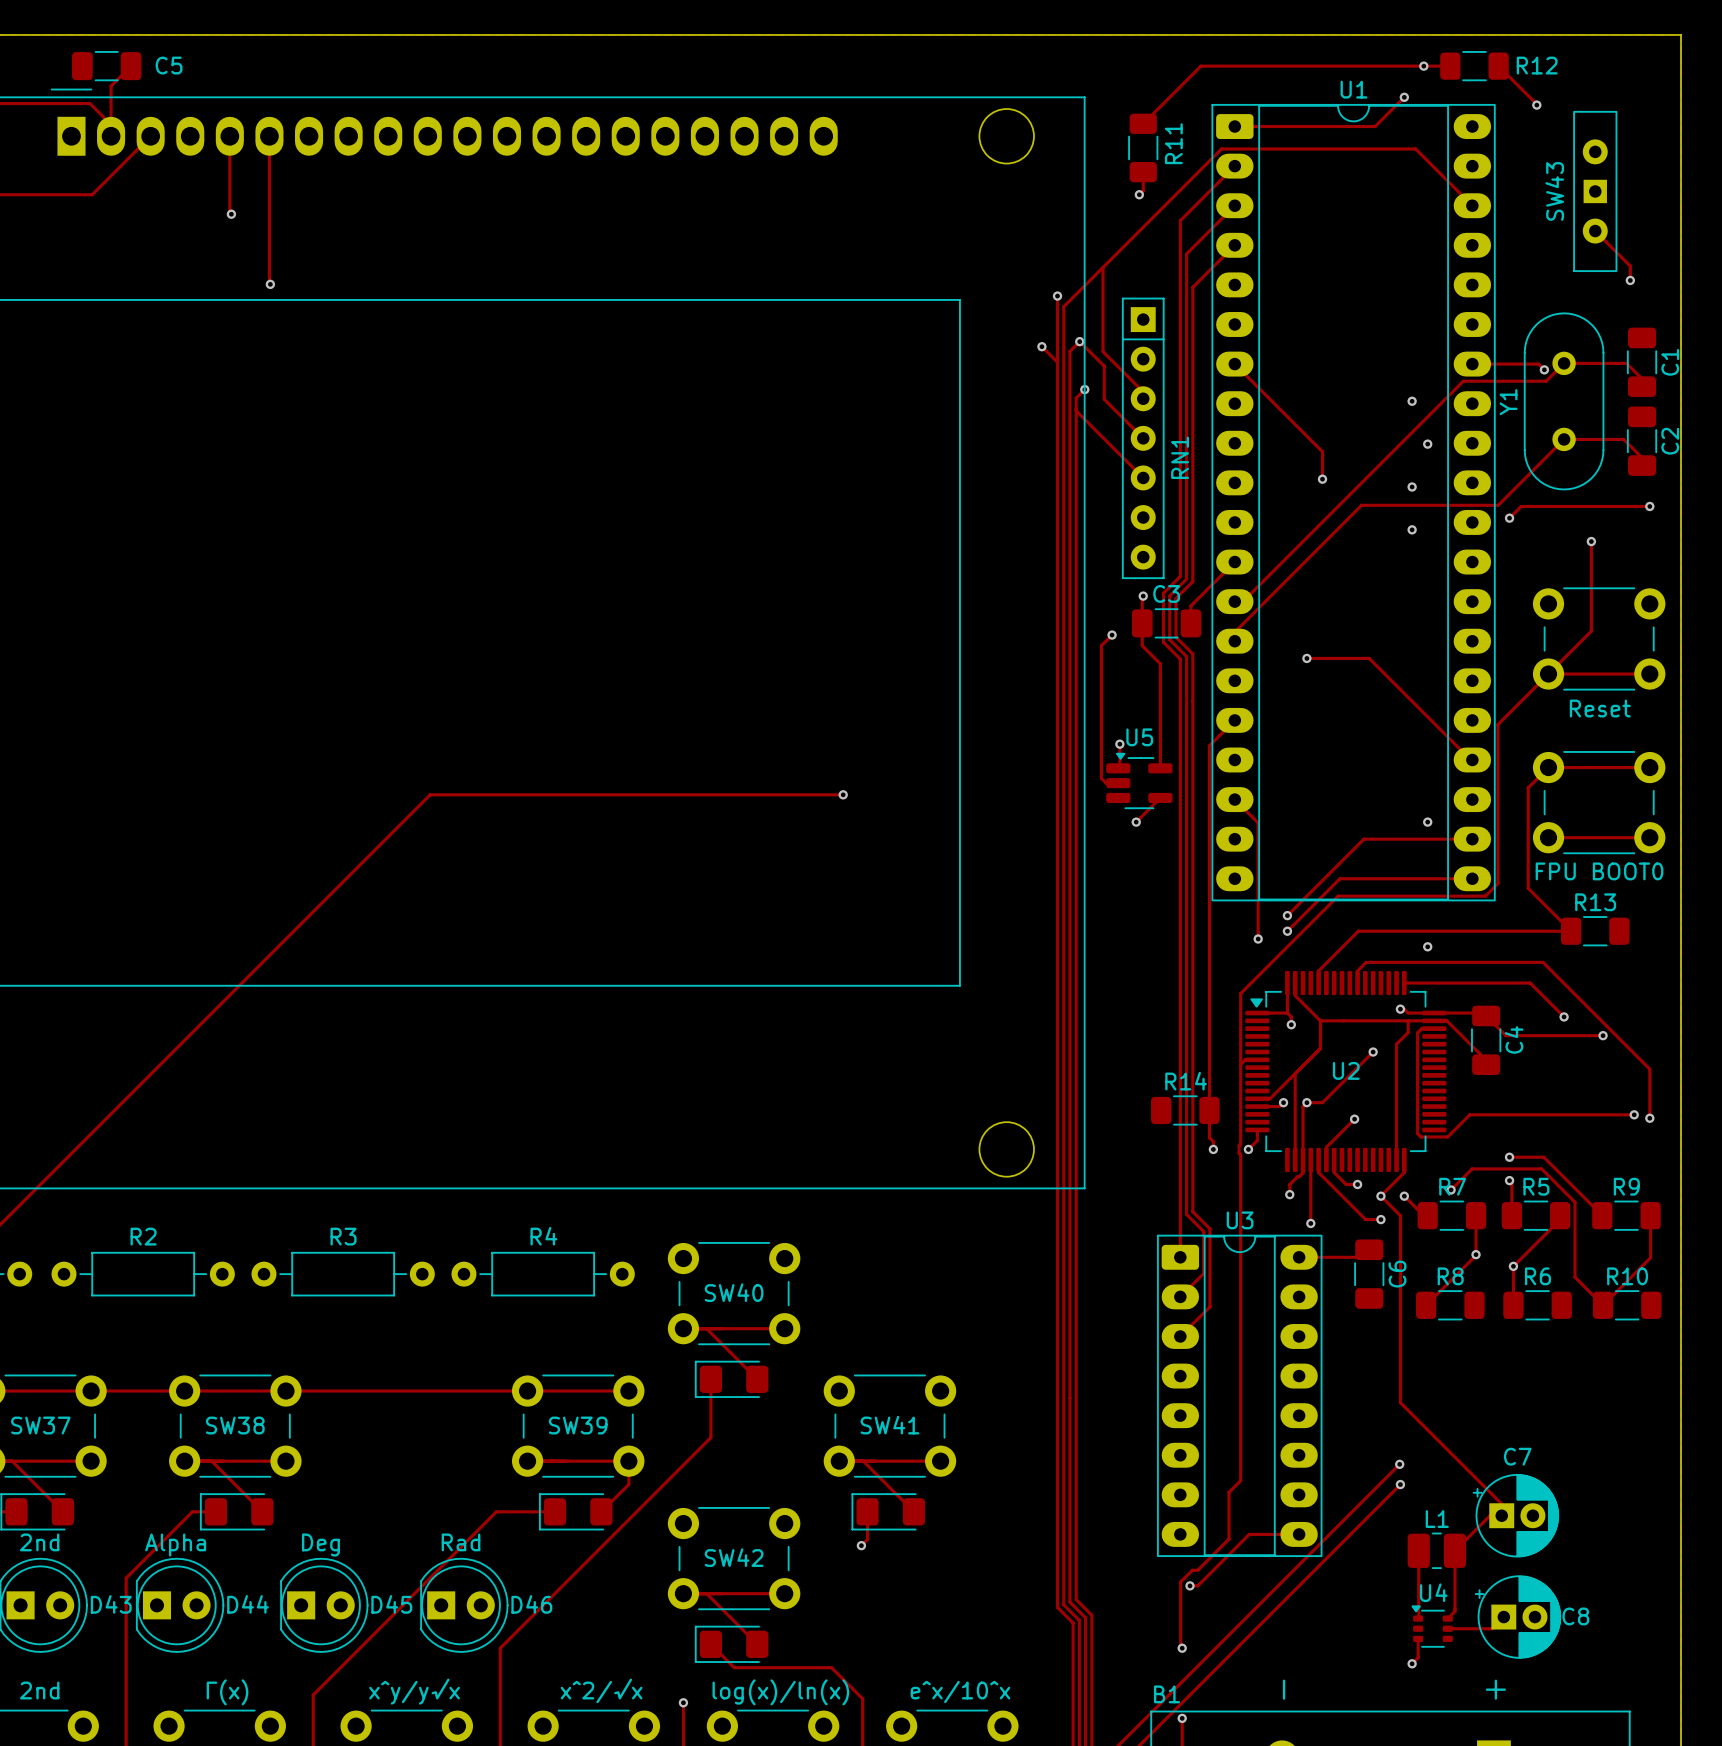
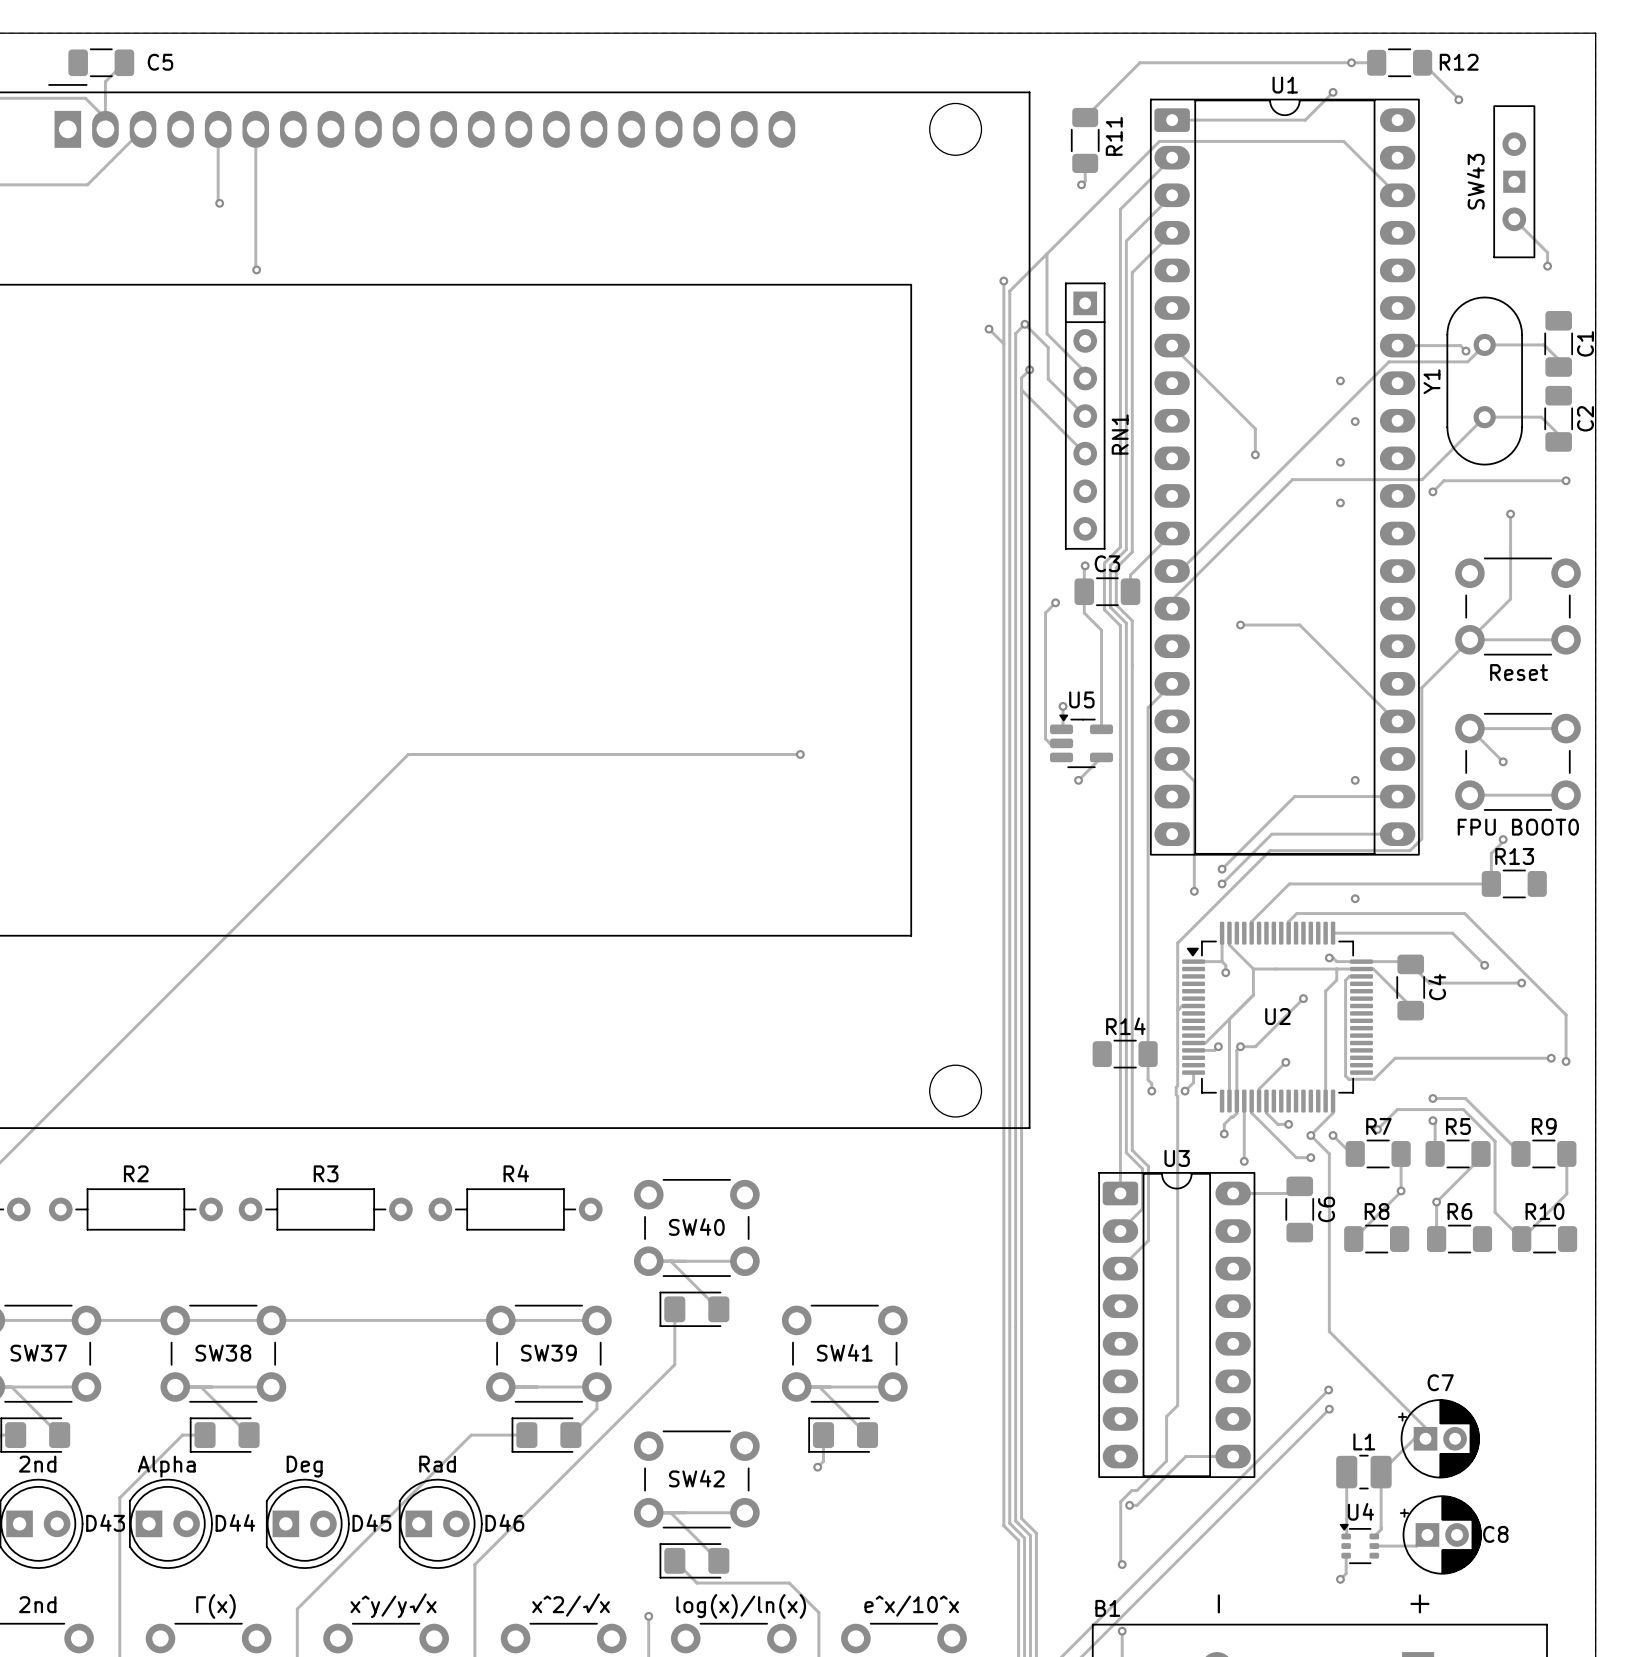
track: (1548, 767) (1528, 787) (1528, 888) (1571, 931) -> (1503, 839) (1491, 853) (1491, 883)
track: none -> (1469, 728) (1503, 761)
via: none -> (1503, 761)
via: none -> (1503, 839)

